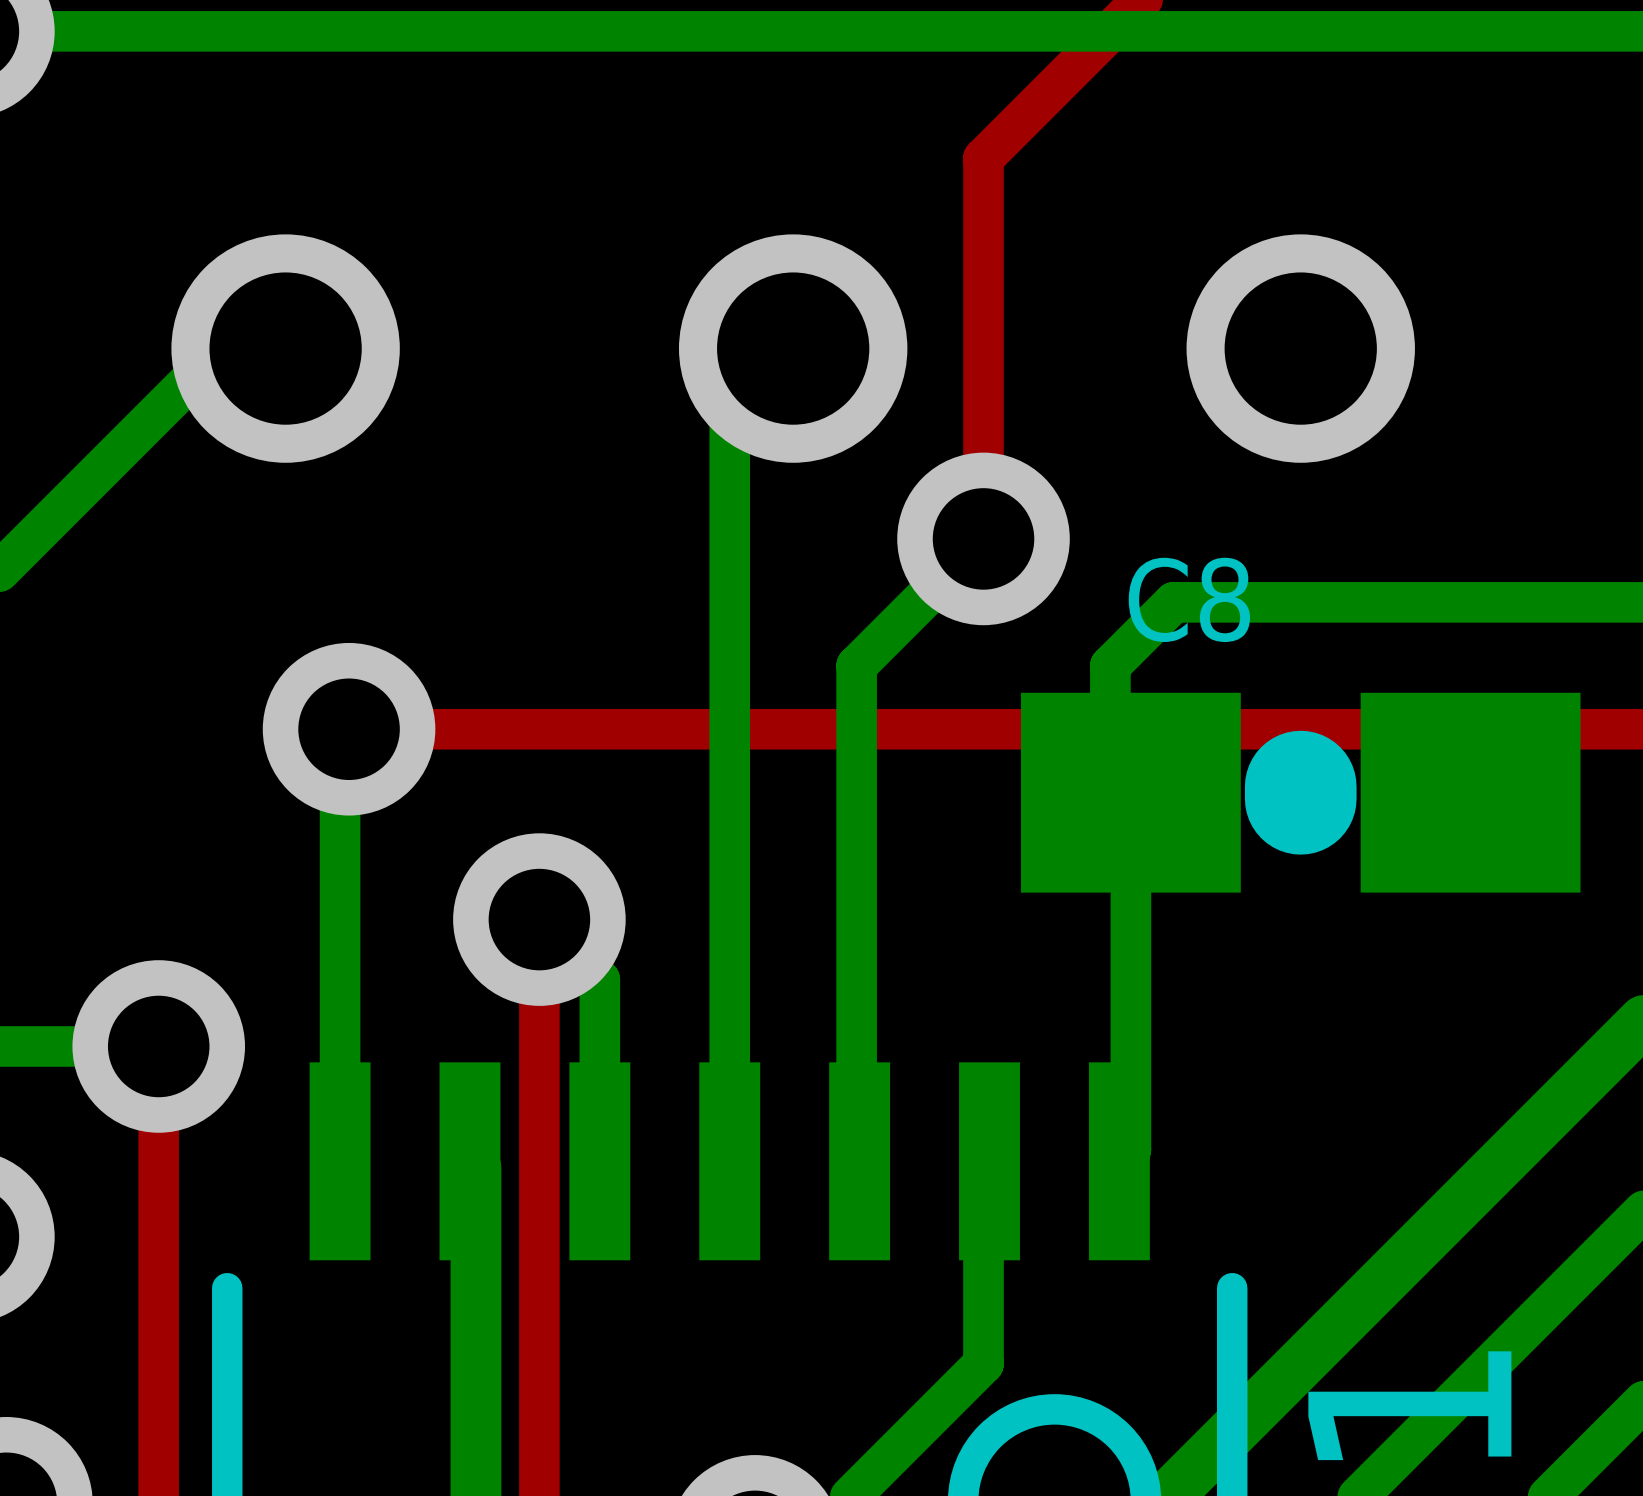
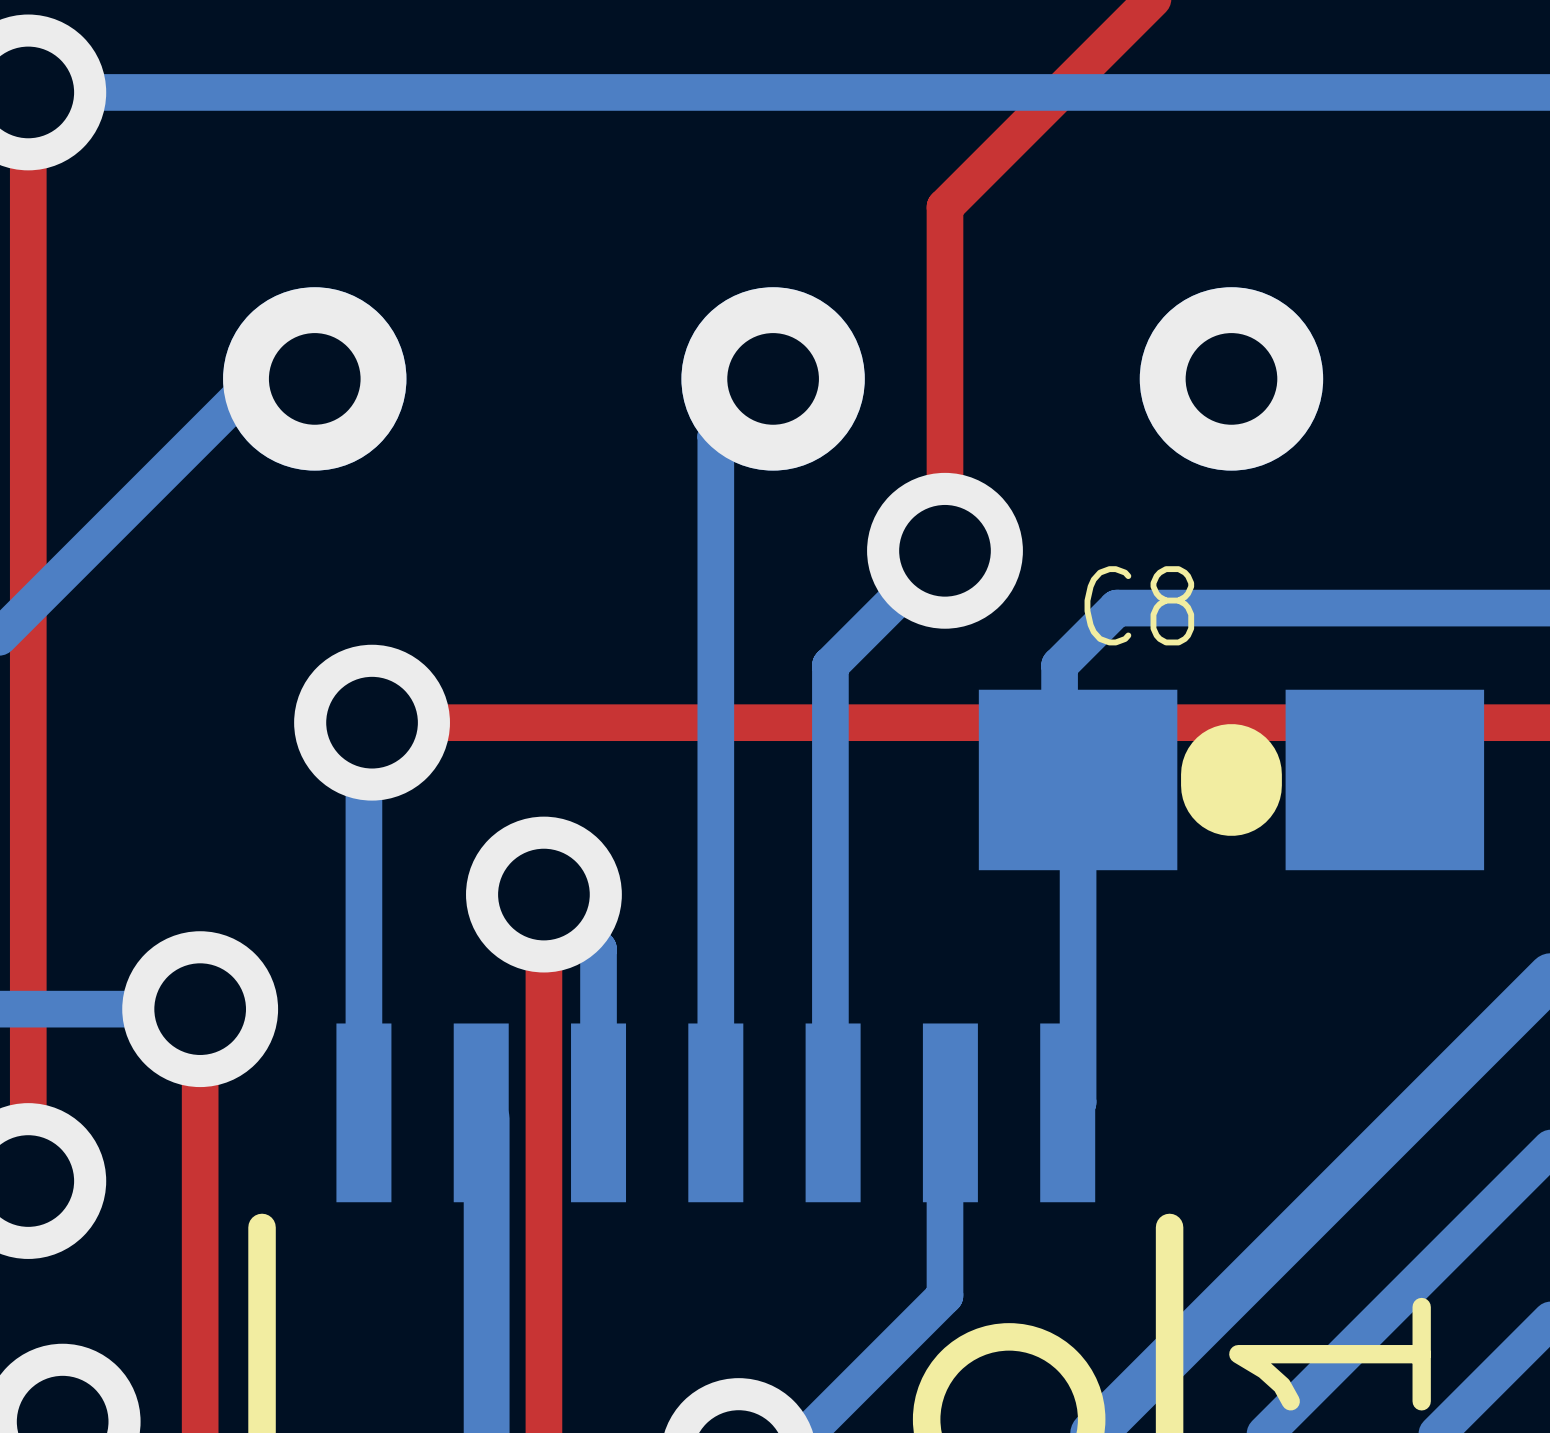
via size: [171, 234, 400, 463] -> [223, 287, 407, 471]
via size: [678, 234, 908, 463] -> [681, 287, 865, 471]
via size: [1186, 234, 1415, 463] -> [1139, 287, 1324, 471]

